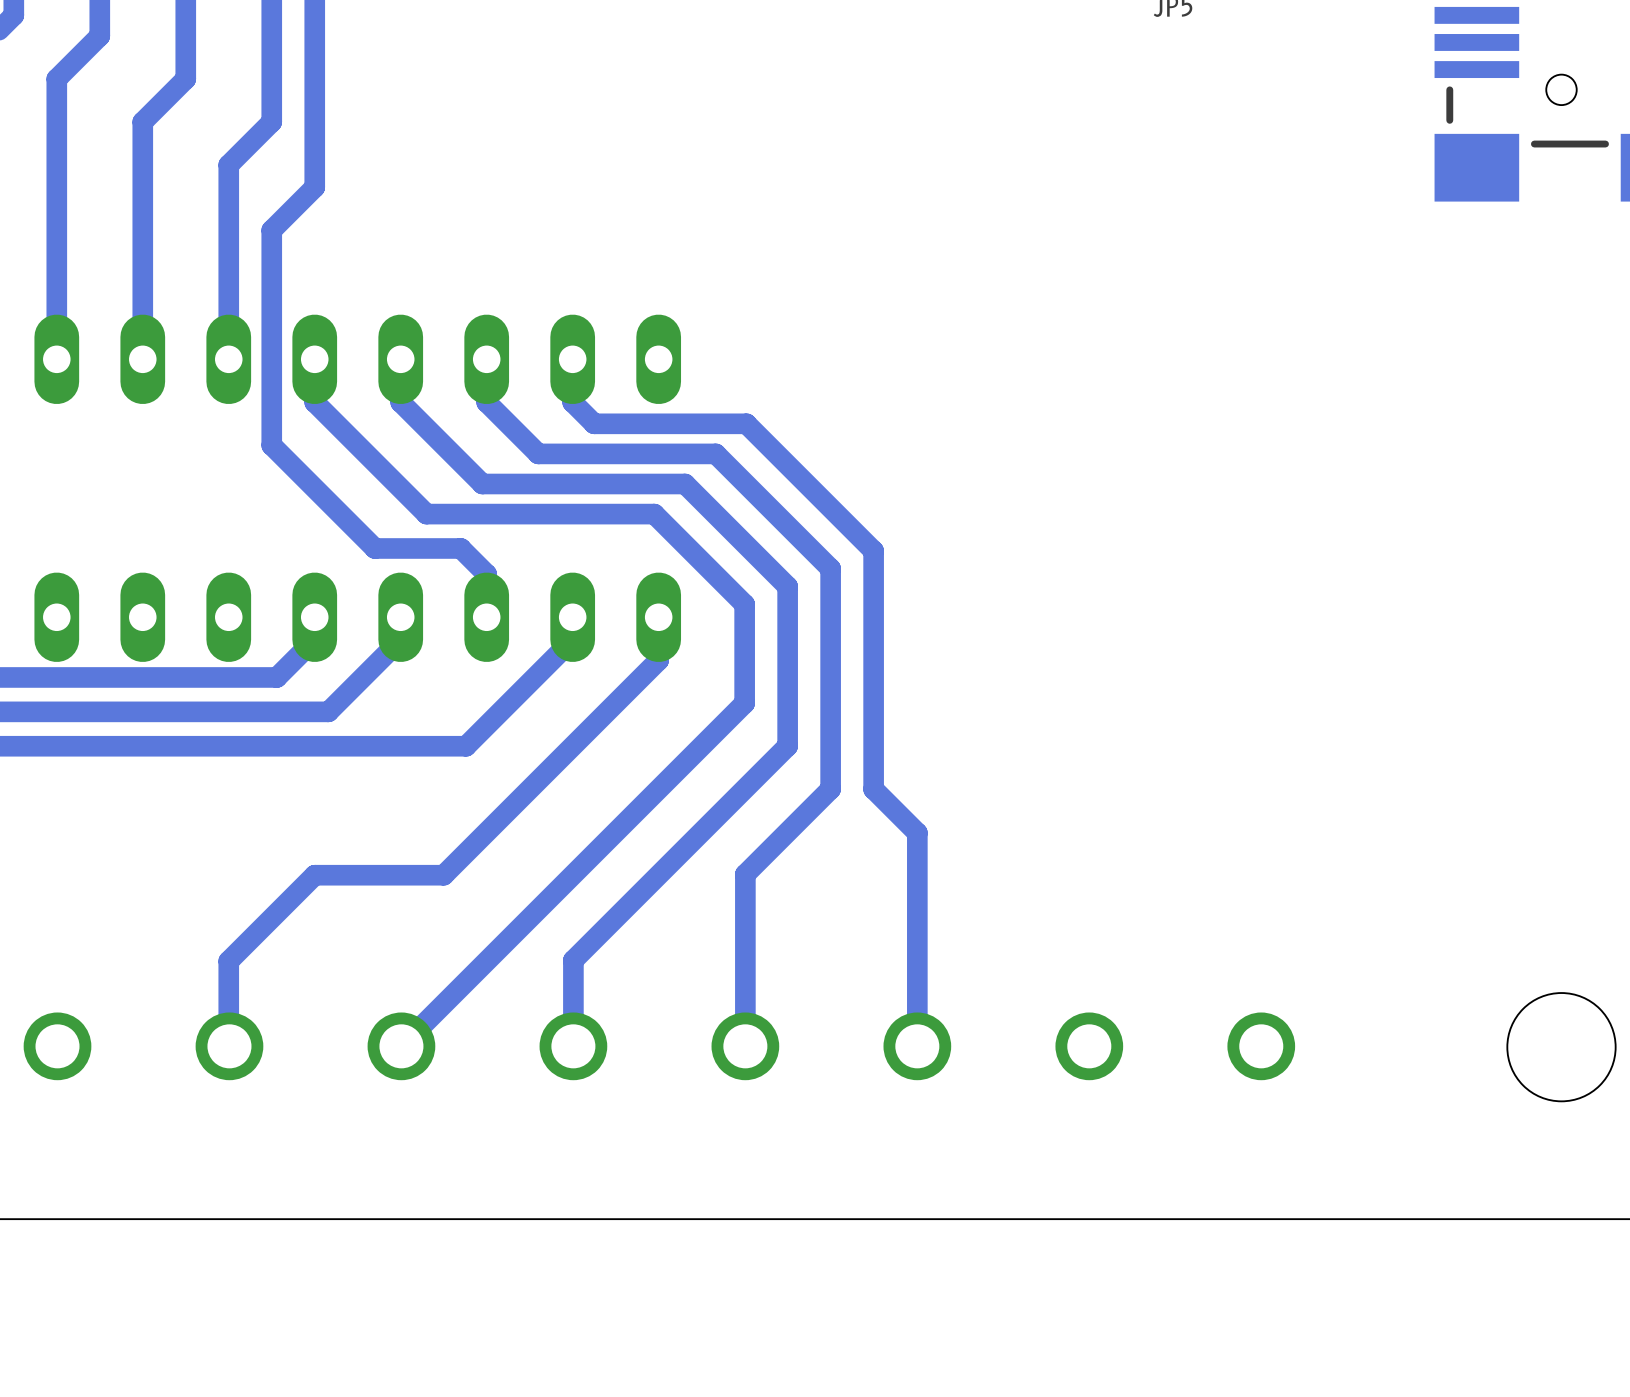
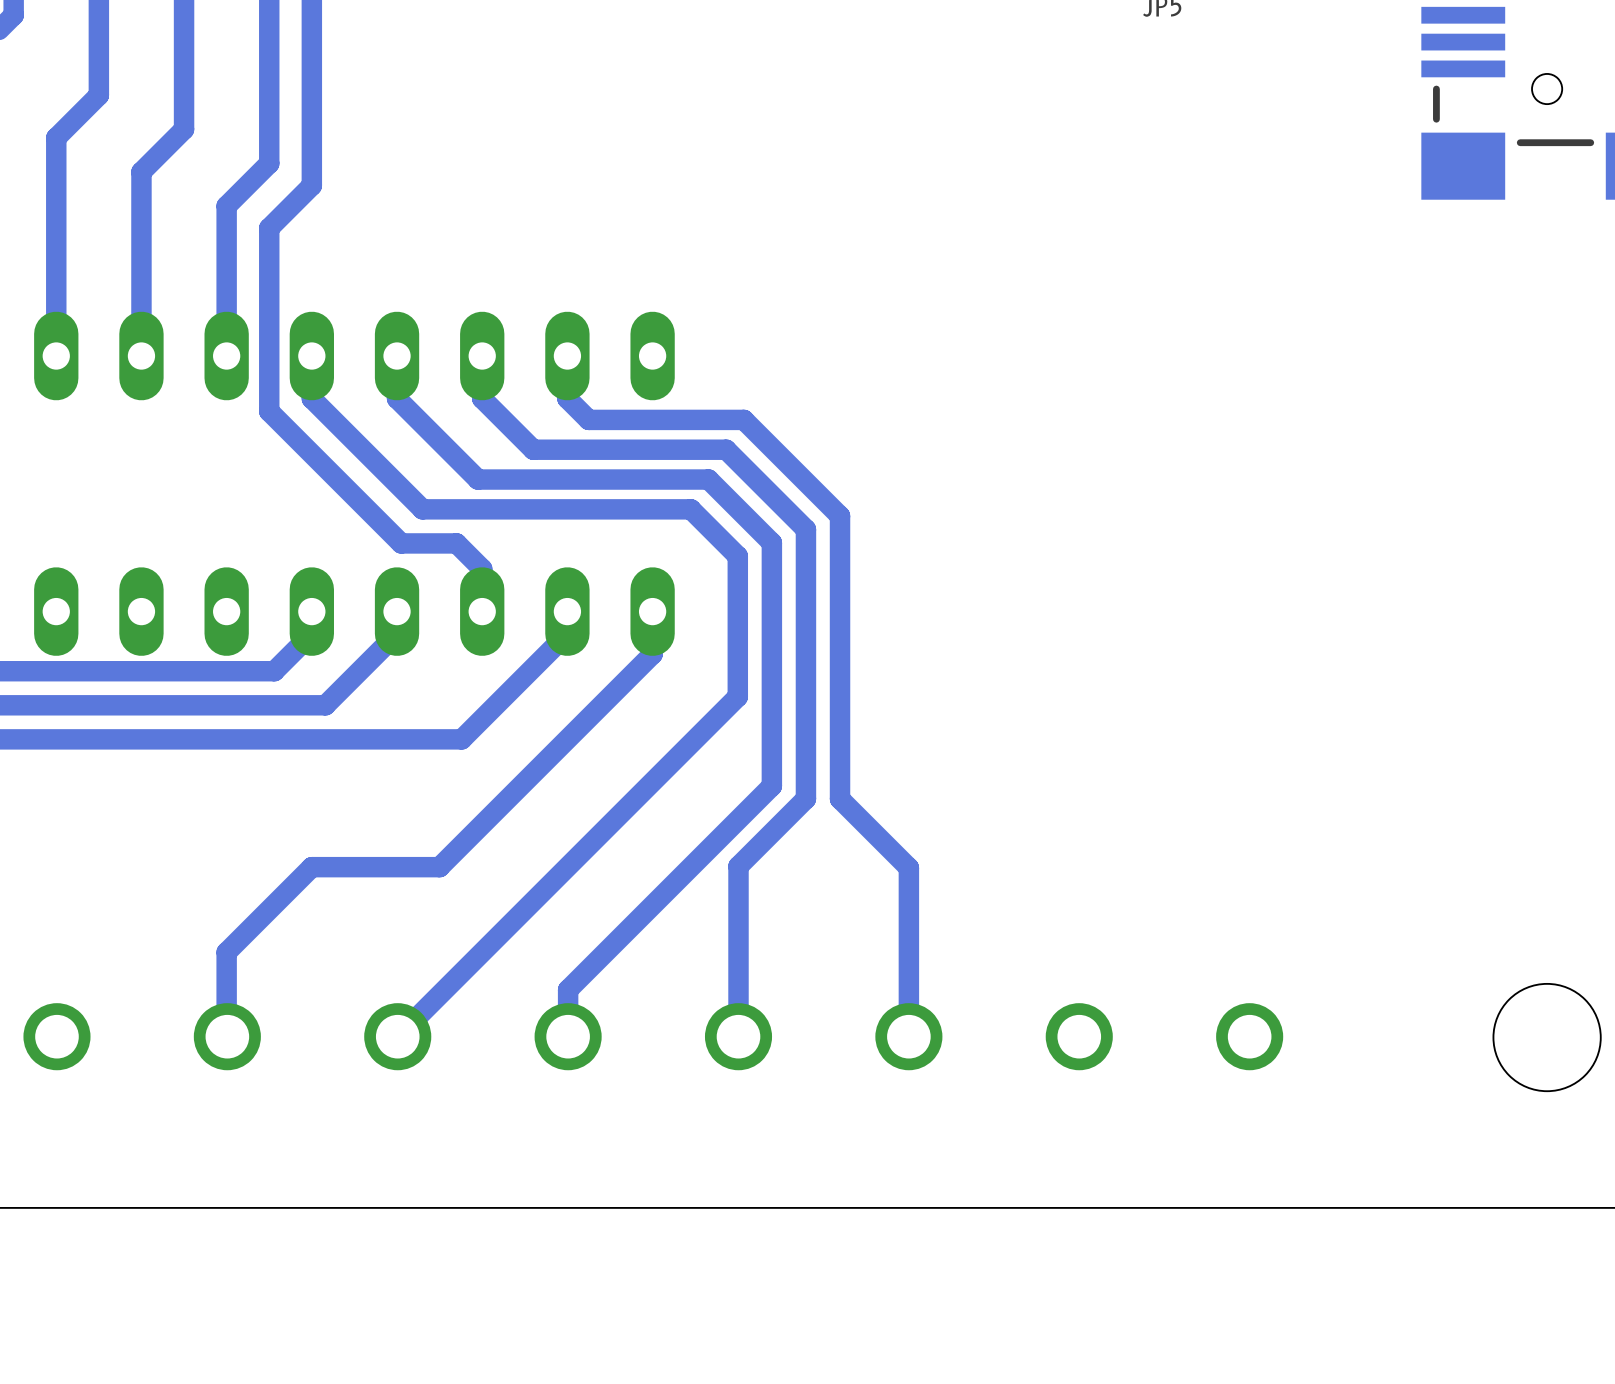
track: (99, 36) (56, 79) (56, 139) -> (98, 35) (98, 95) (56, 137)
track: (185, 79) (142, 122) (142, 173) -> (184, 78) (184, 129) (141, 172)
track: (271, 122) (228, 165) (228, 207) -> (269, 120) (269, 163) (226, 206)
track: (271, 415) (271, 445) (374, 548) (405, 548) -> (269, 411) (401, 543)
track: (746, 423) (873, 550) (873, 789) (917, 832) (917, 875) -> (739, 419) (743, 419) (840, 516) (840, 799) (908, 867)
track: (715, 453) (830, 568) (830, 789) (813, 806) -> (709, 449) (726, 449) (805, 529) (805, 798)
track: (685, 484) (787, 586) (787, 746) (573, 960) (573, 999) -> (678, 479) (708, 479) (771, 542) (771, 786) (568, 989)
track: (654, 514) (744, 604) -> (648, 509) (690, 509) (737, 556) (737, 598)

